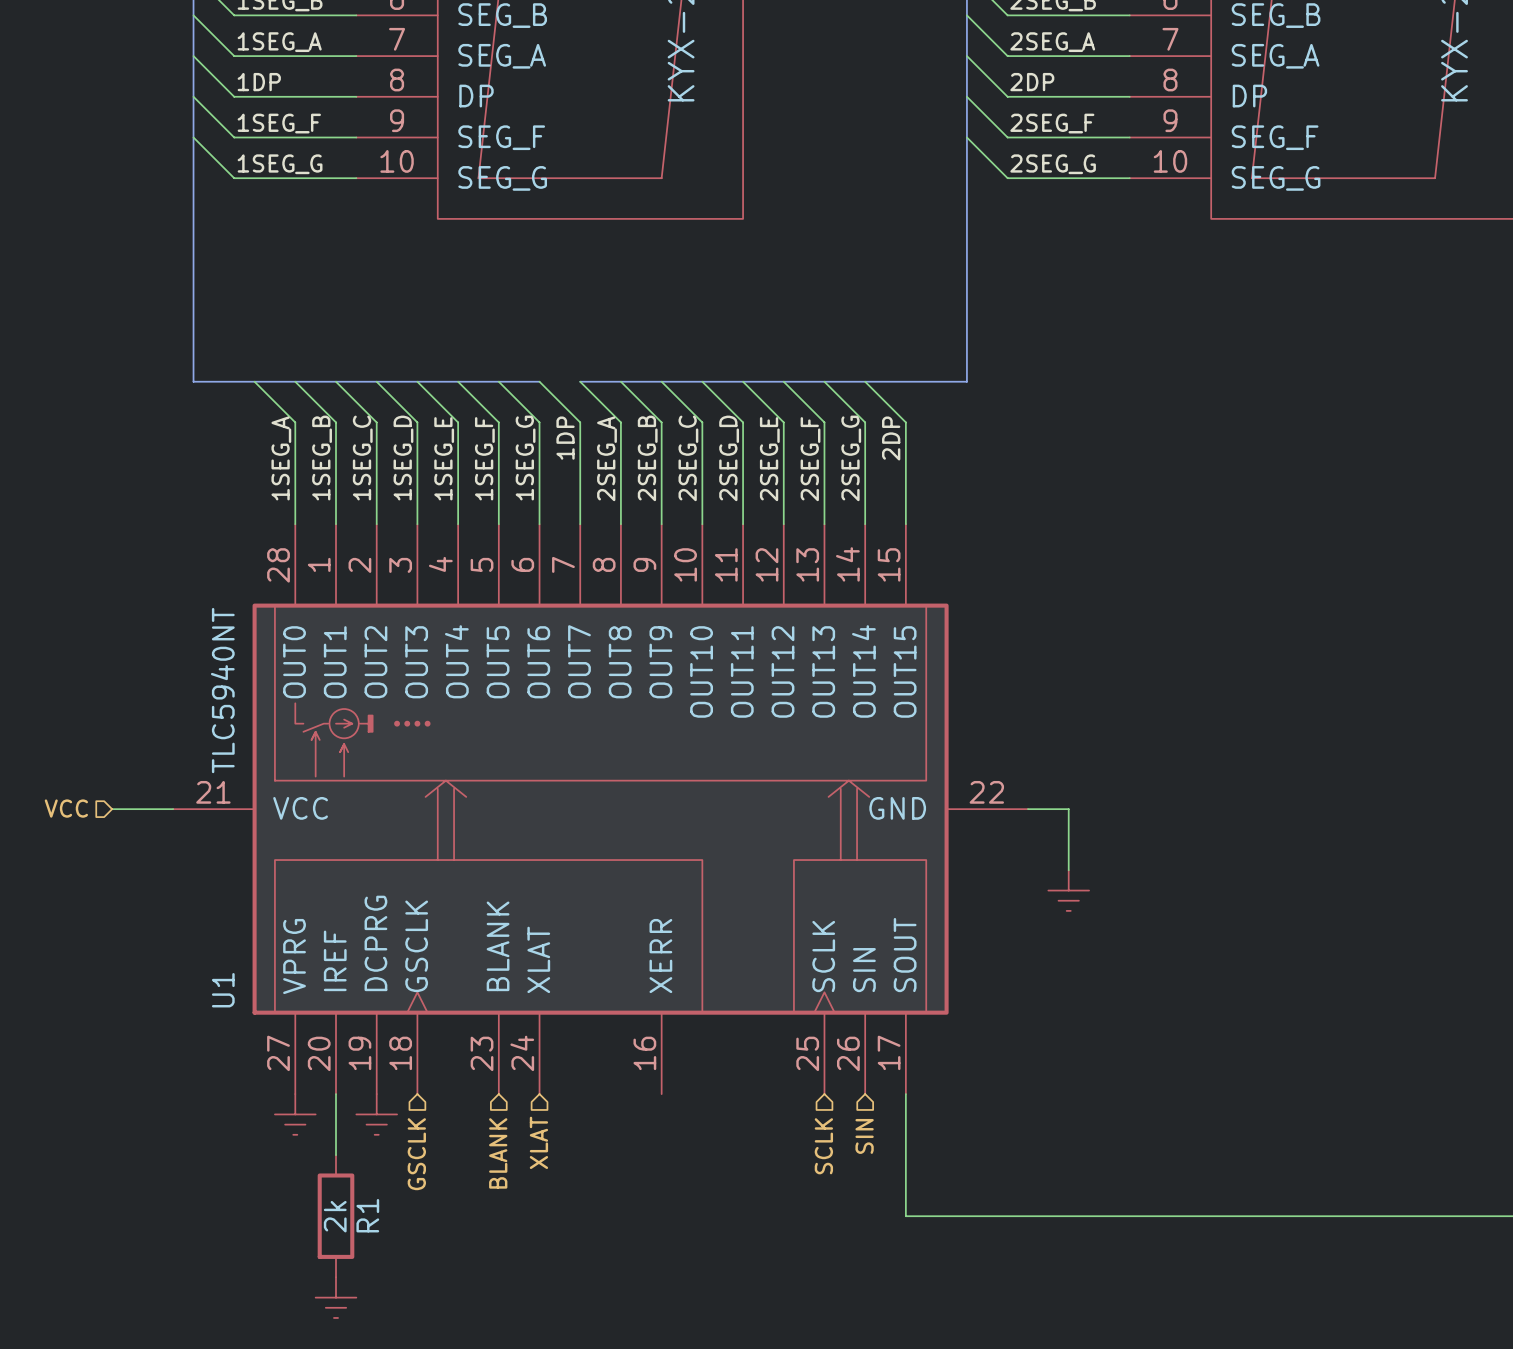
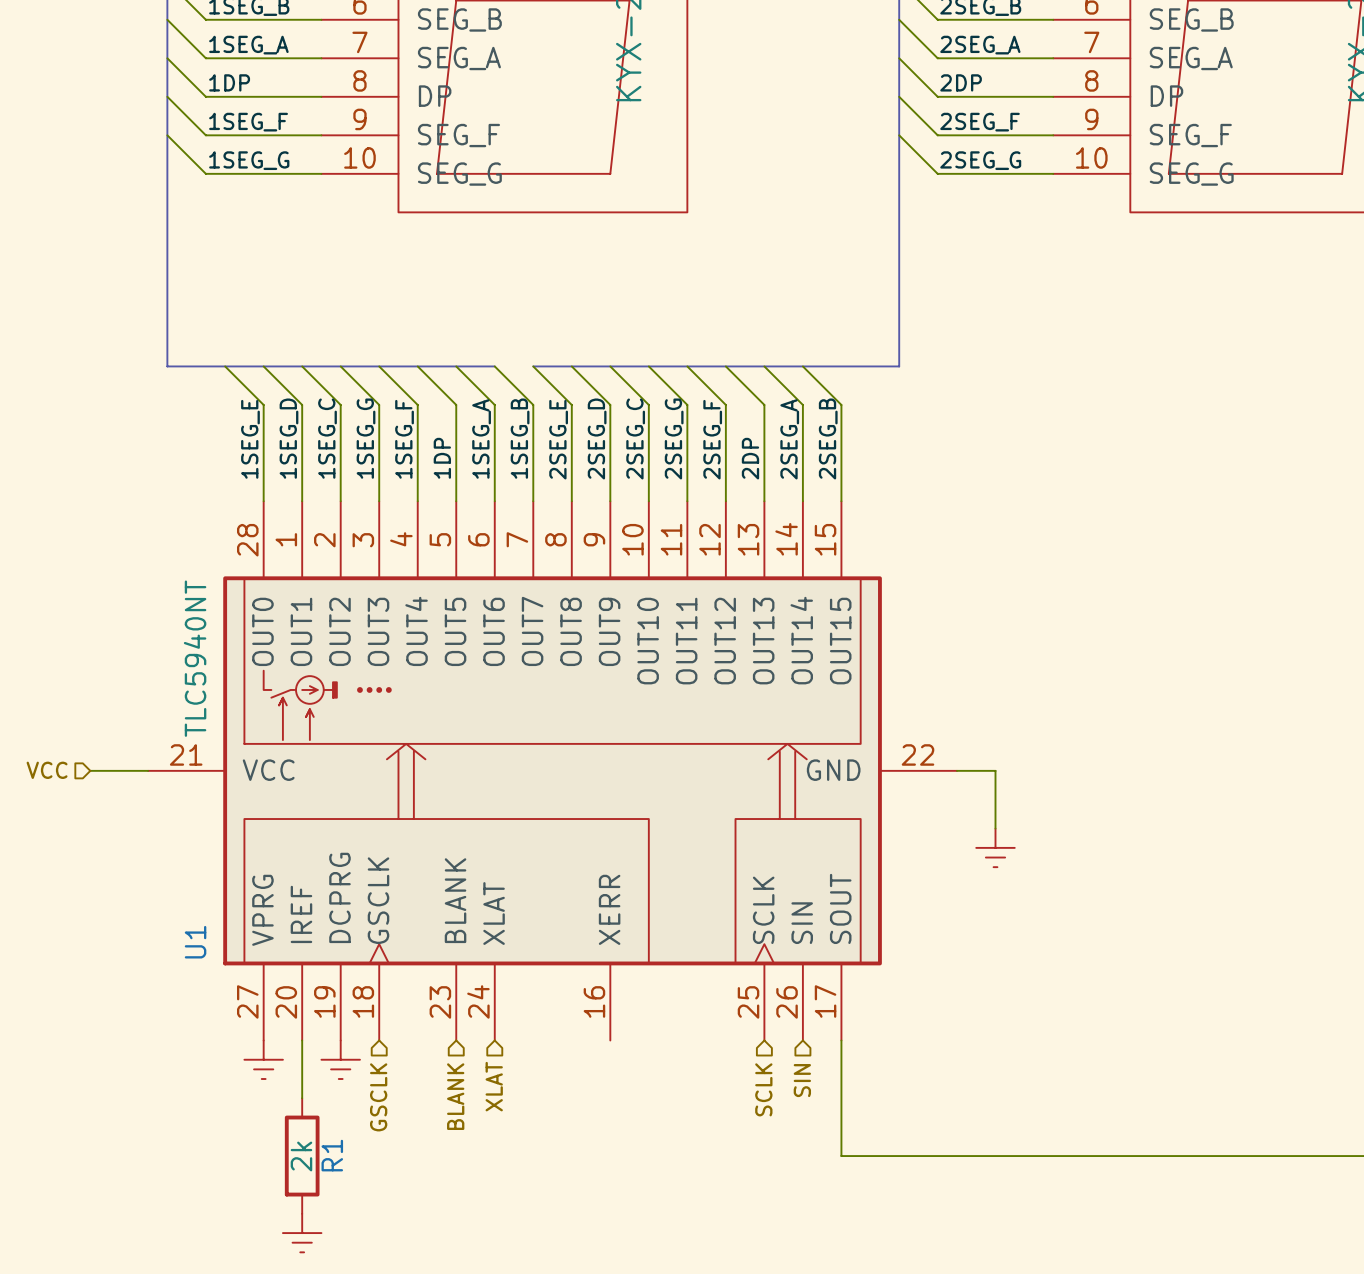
label: 1DP (565, 438) -> none
label: 2DP (891, 438) -> none
label: 1SEG_A (281, 458) -> 1SEG_E (250, 439)
label: 1SEG_B (322, 458) -> 1SEG_D (288, 438)
label: 1SEG_D (403, 458) -> 1SEG_G (366, 438)
label: 1SEG_E (444, 458) -> 1SEG_F (404, 439)
label: 1SEG_F (484, 458) -> 1DP (442, 458)
label: 1SEG_G (525, 458) -> 1SEG_A (481, 438)
label: none -> 1SEG_B (520, 438)
label: 2SEG_A (606, 458) -> 2SEG_E (558, 439)
label: 2SEG_B (647, 458) -> 2SEG_D (597, 438)
label: 2SEG_D (729, 458) -> 2SEG_G (674, 438)
label: 2SEG_G (851, 458) -> 2SEG_A (789, 439)
label: none -> 2SEG_B (828, 438)
label: 2SEG_E (769, 459) -> 2SEG_F (712, 439)
label: 2SEG_F (810, 459) -> 2DP (750, 458)

